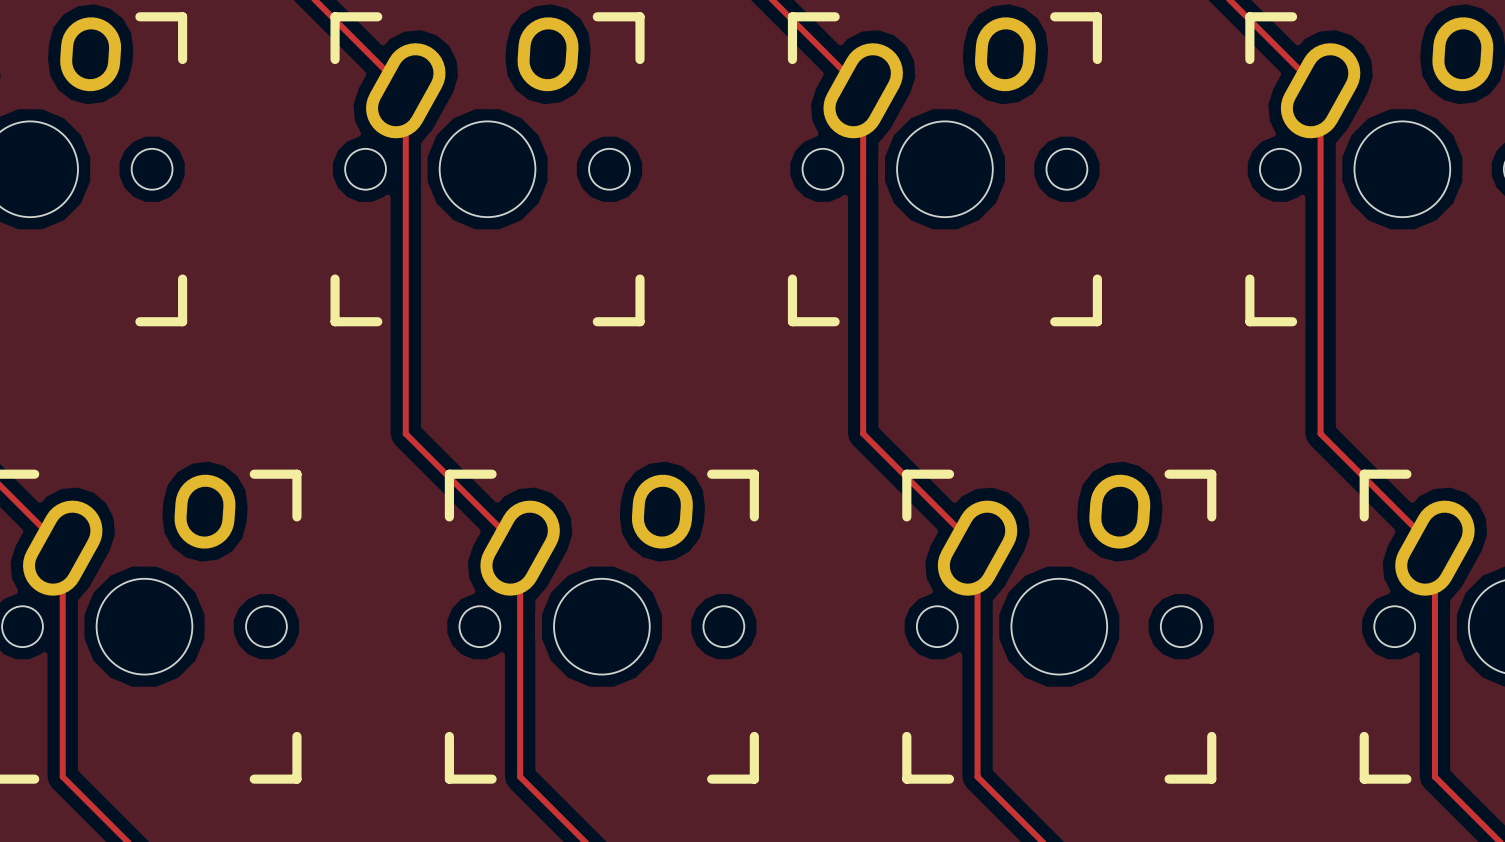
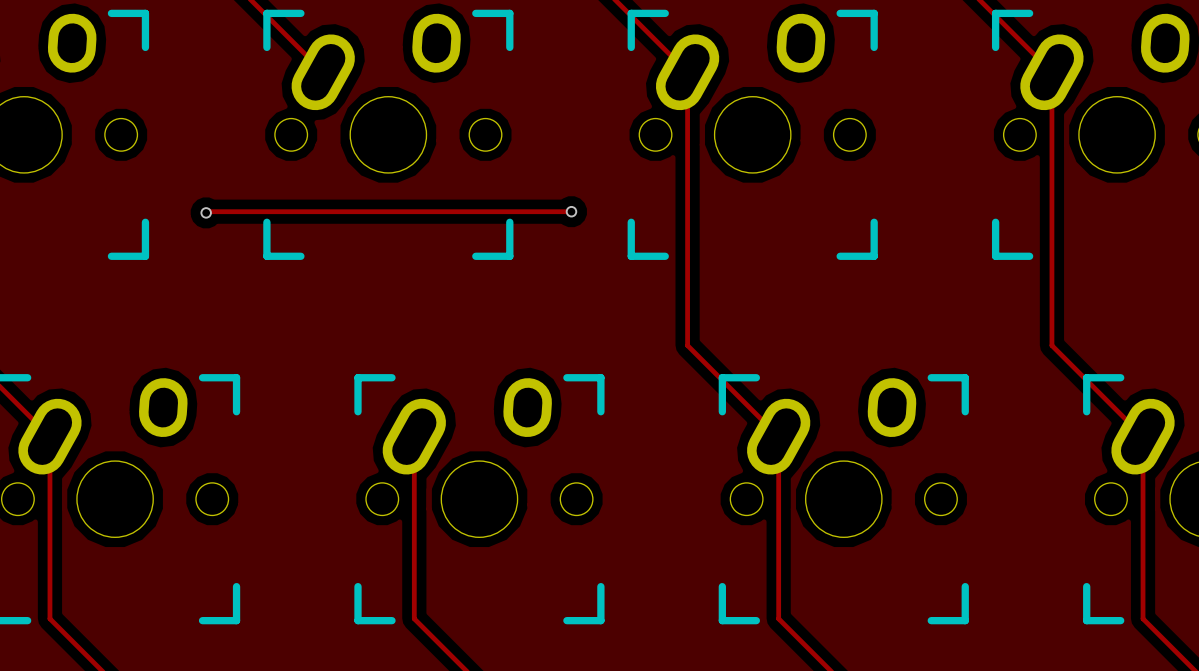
track: (405, 90) (405, 433) (520, 548) -> none
track: none -> (571, 211) (206, 212)
via: none -> (571, 211)
via: none -> (206, 212)

